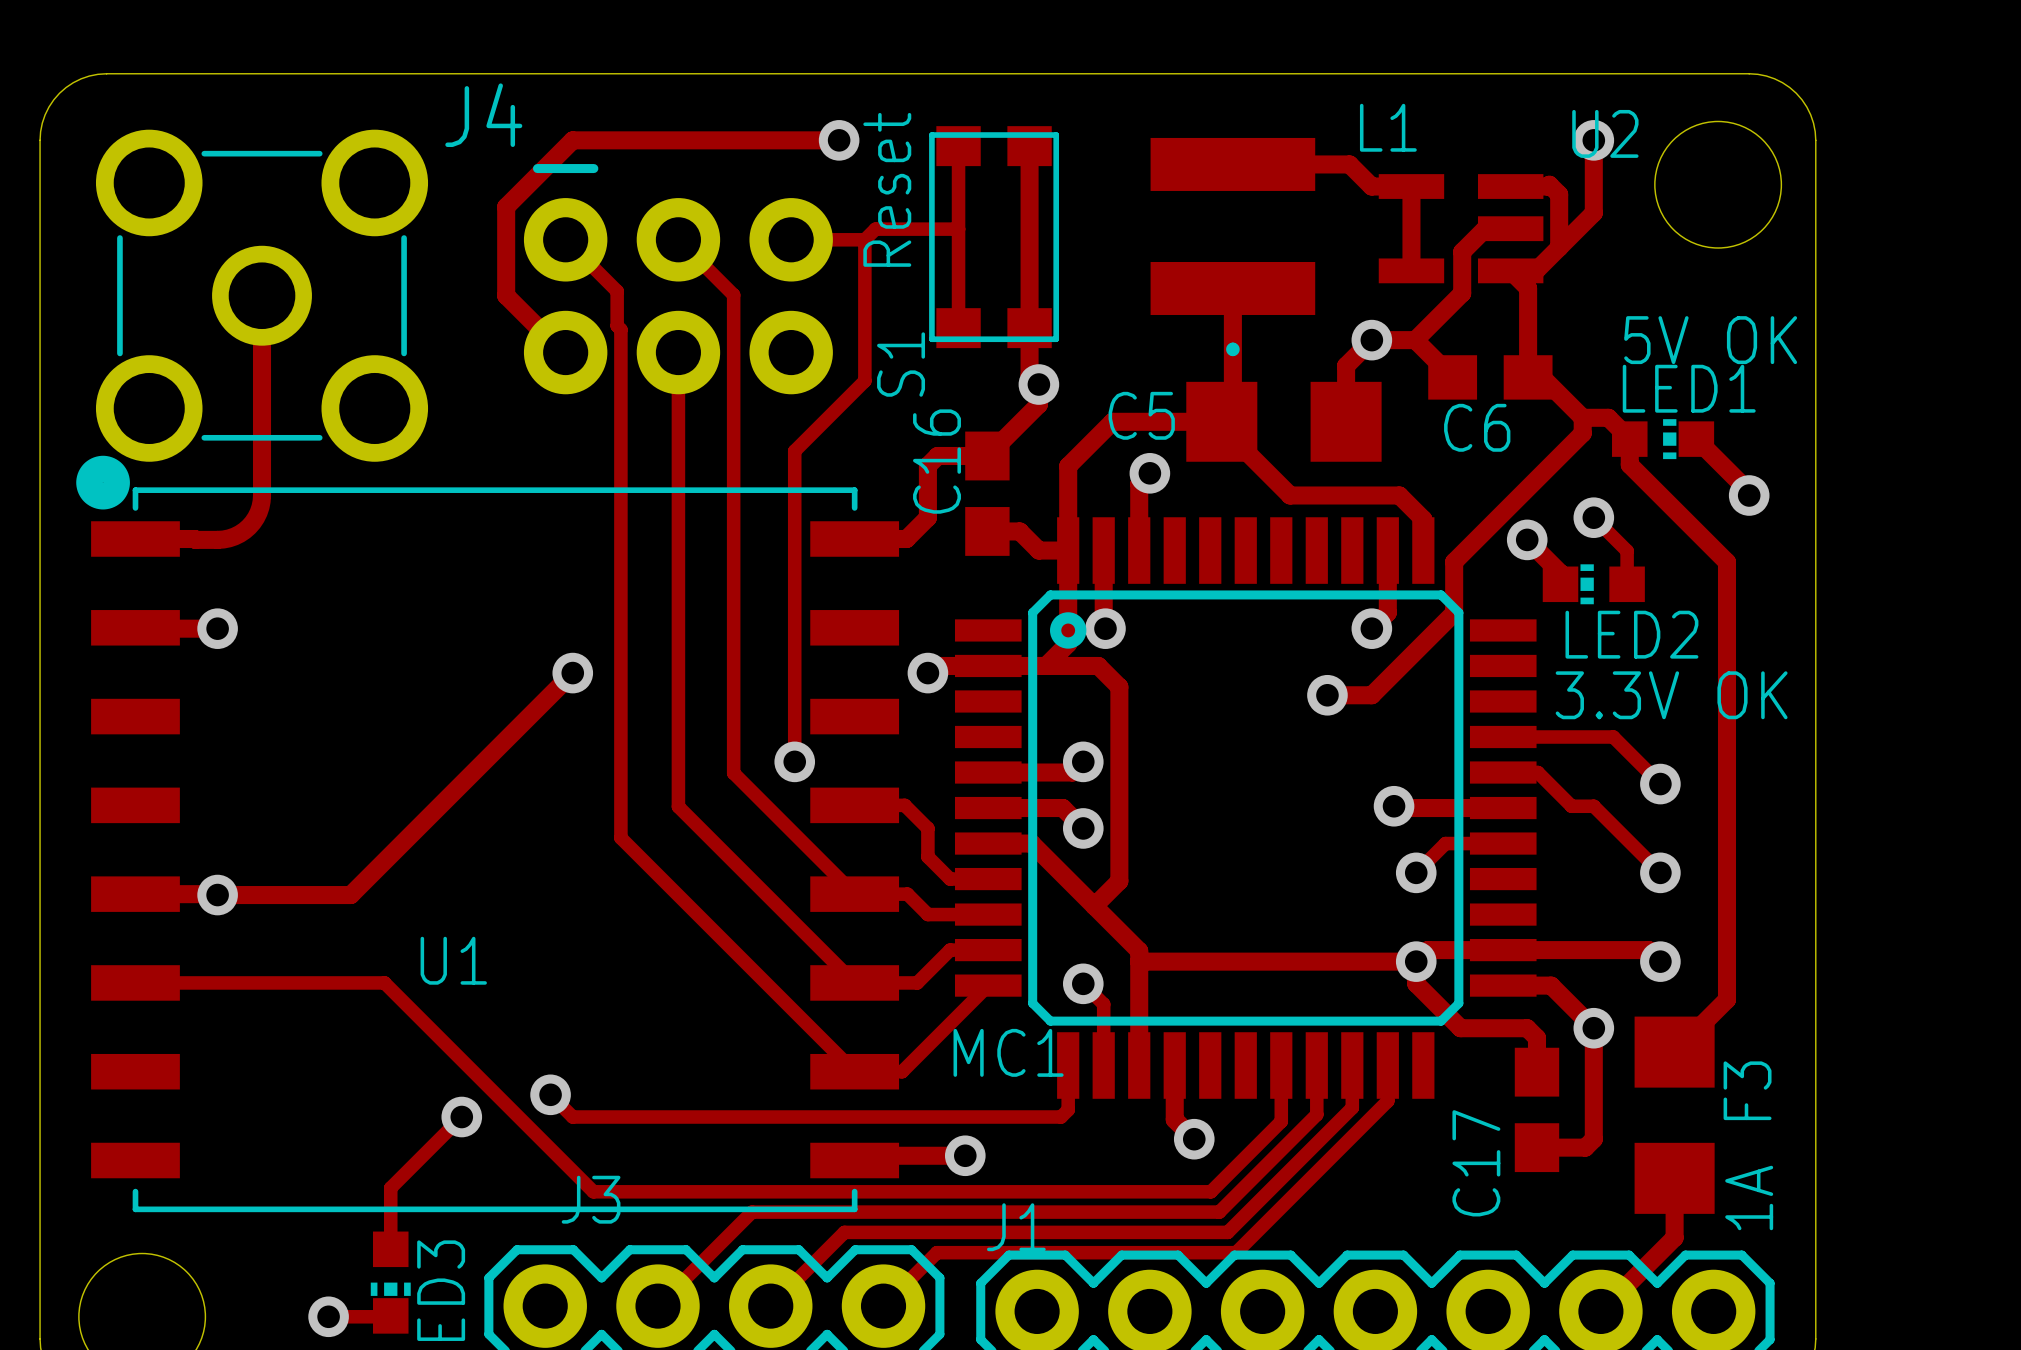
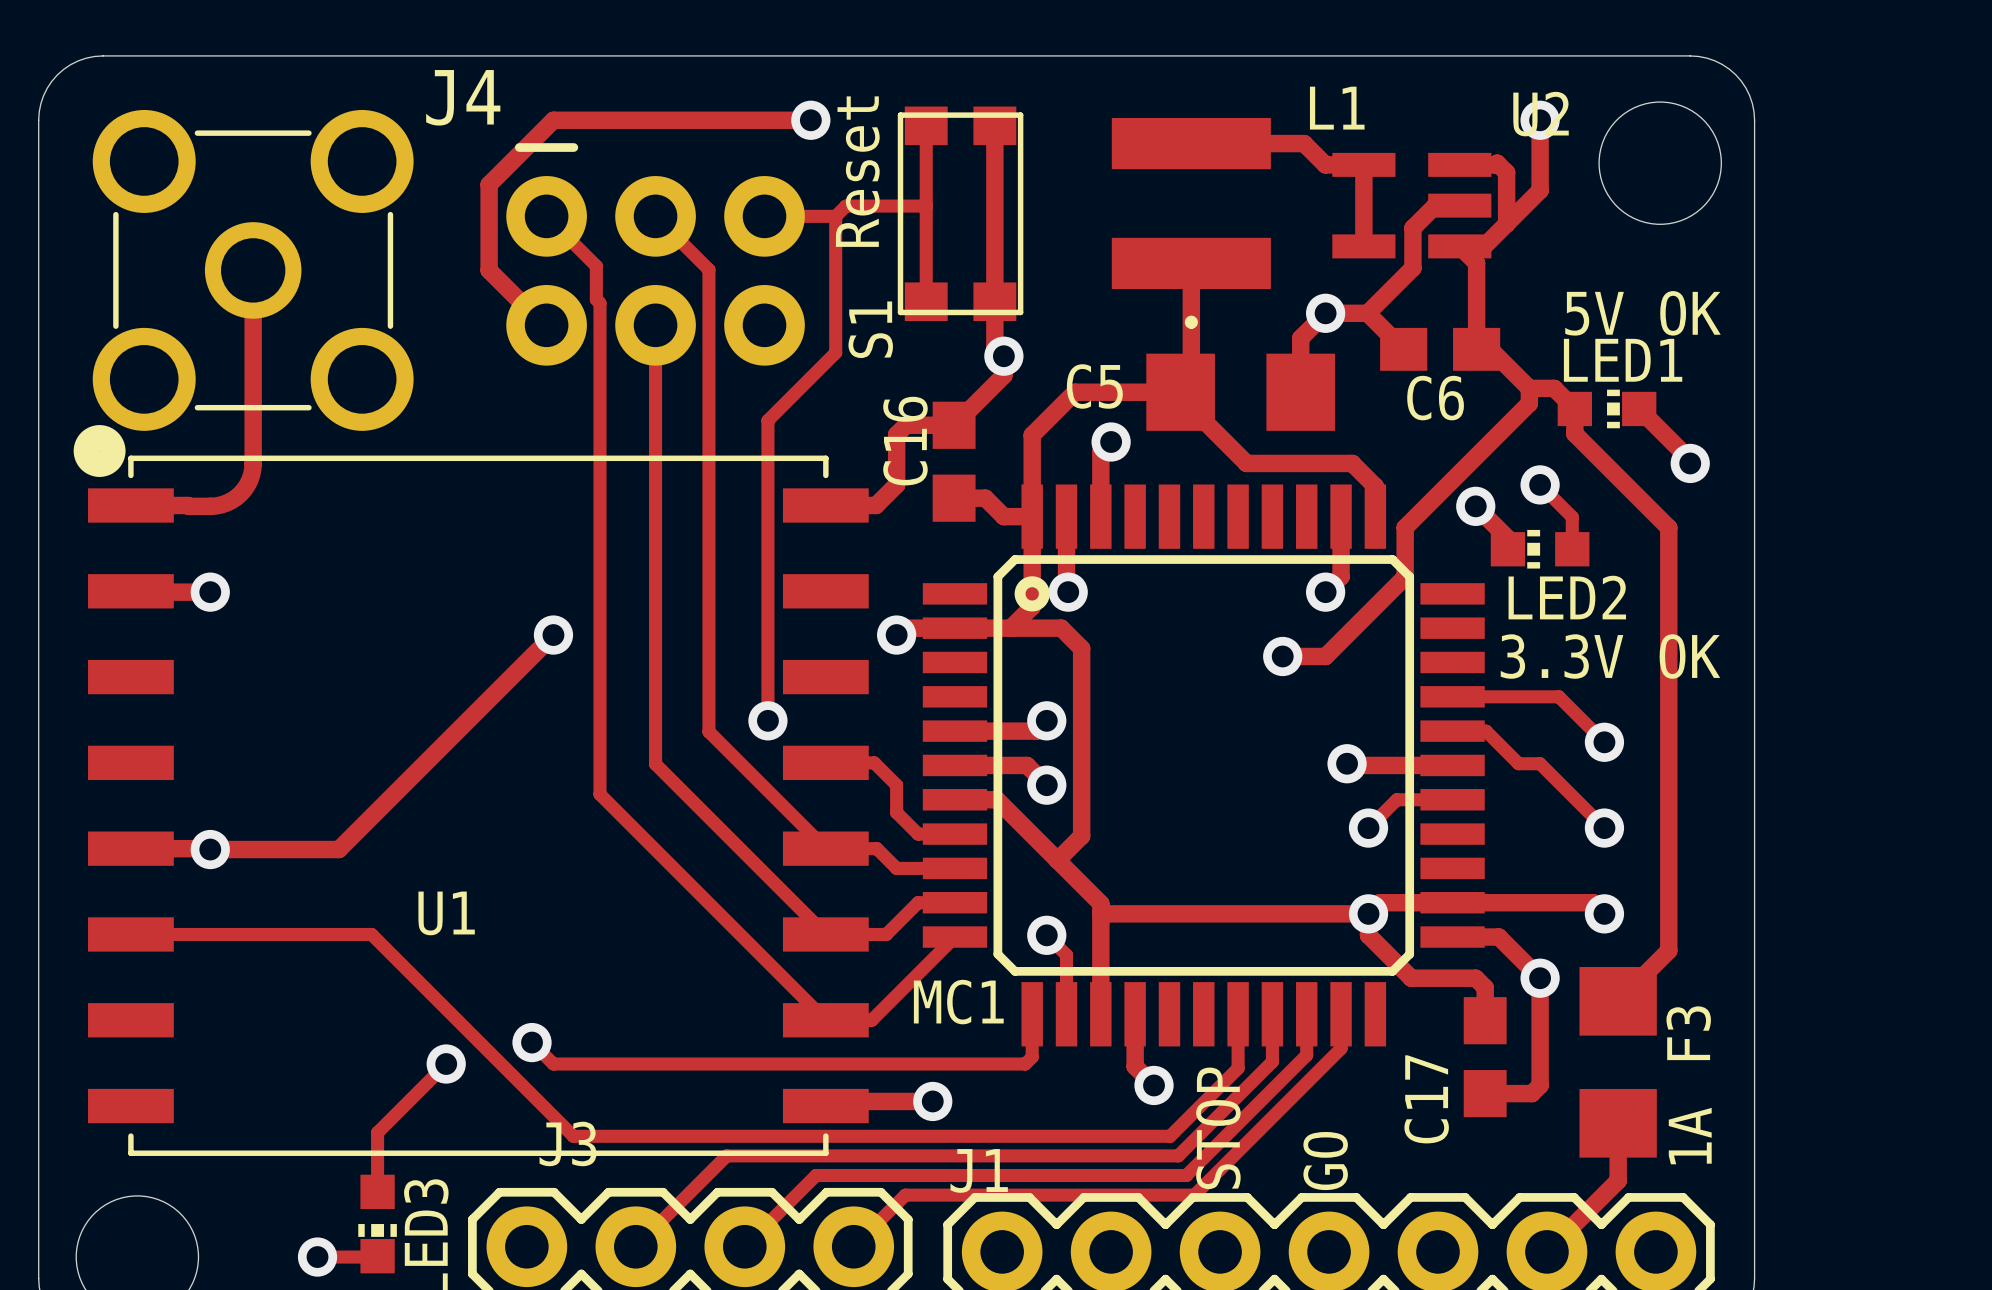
text: none -> STOP (1218, 1128)
text: none -> GO (1325, 1161)

